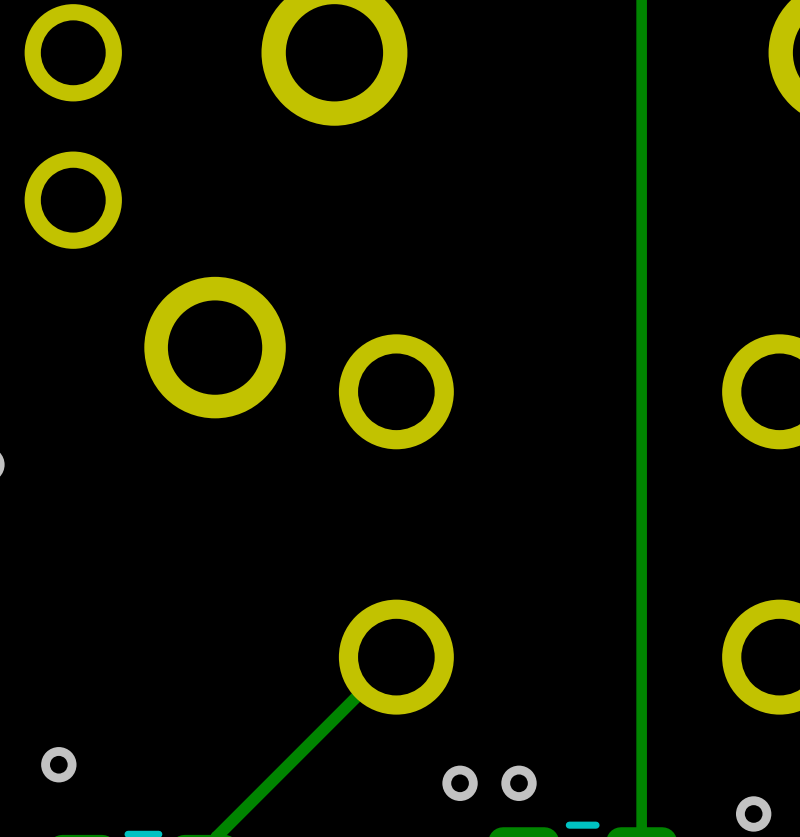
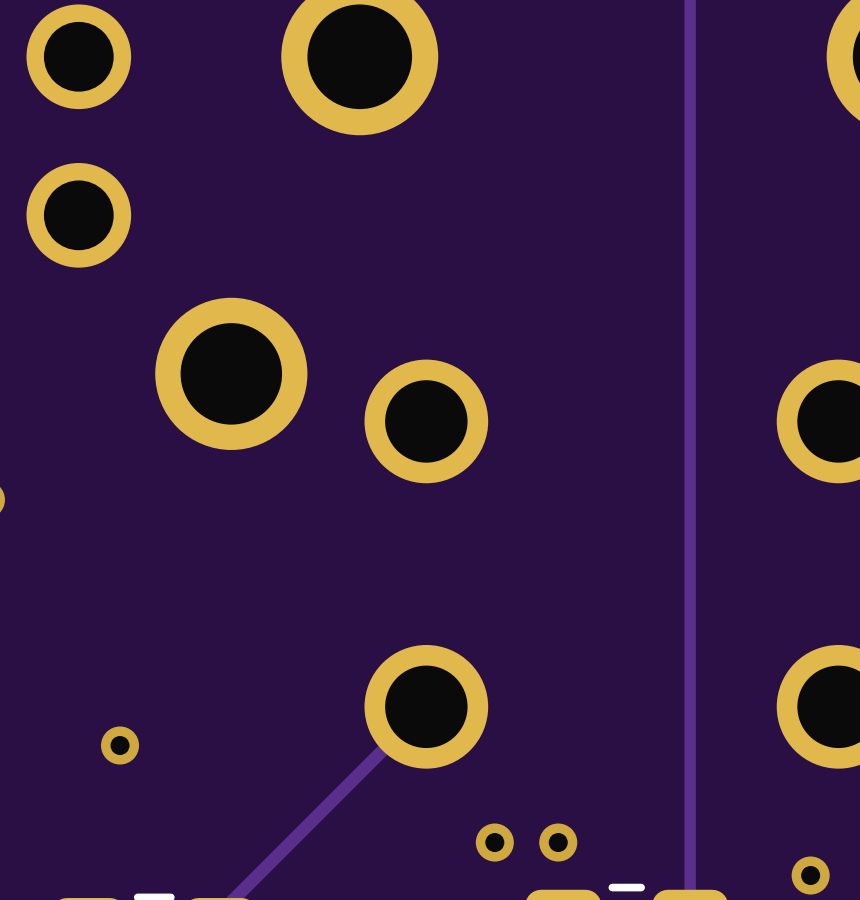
via position: (58, 764) -> (120, 745)

